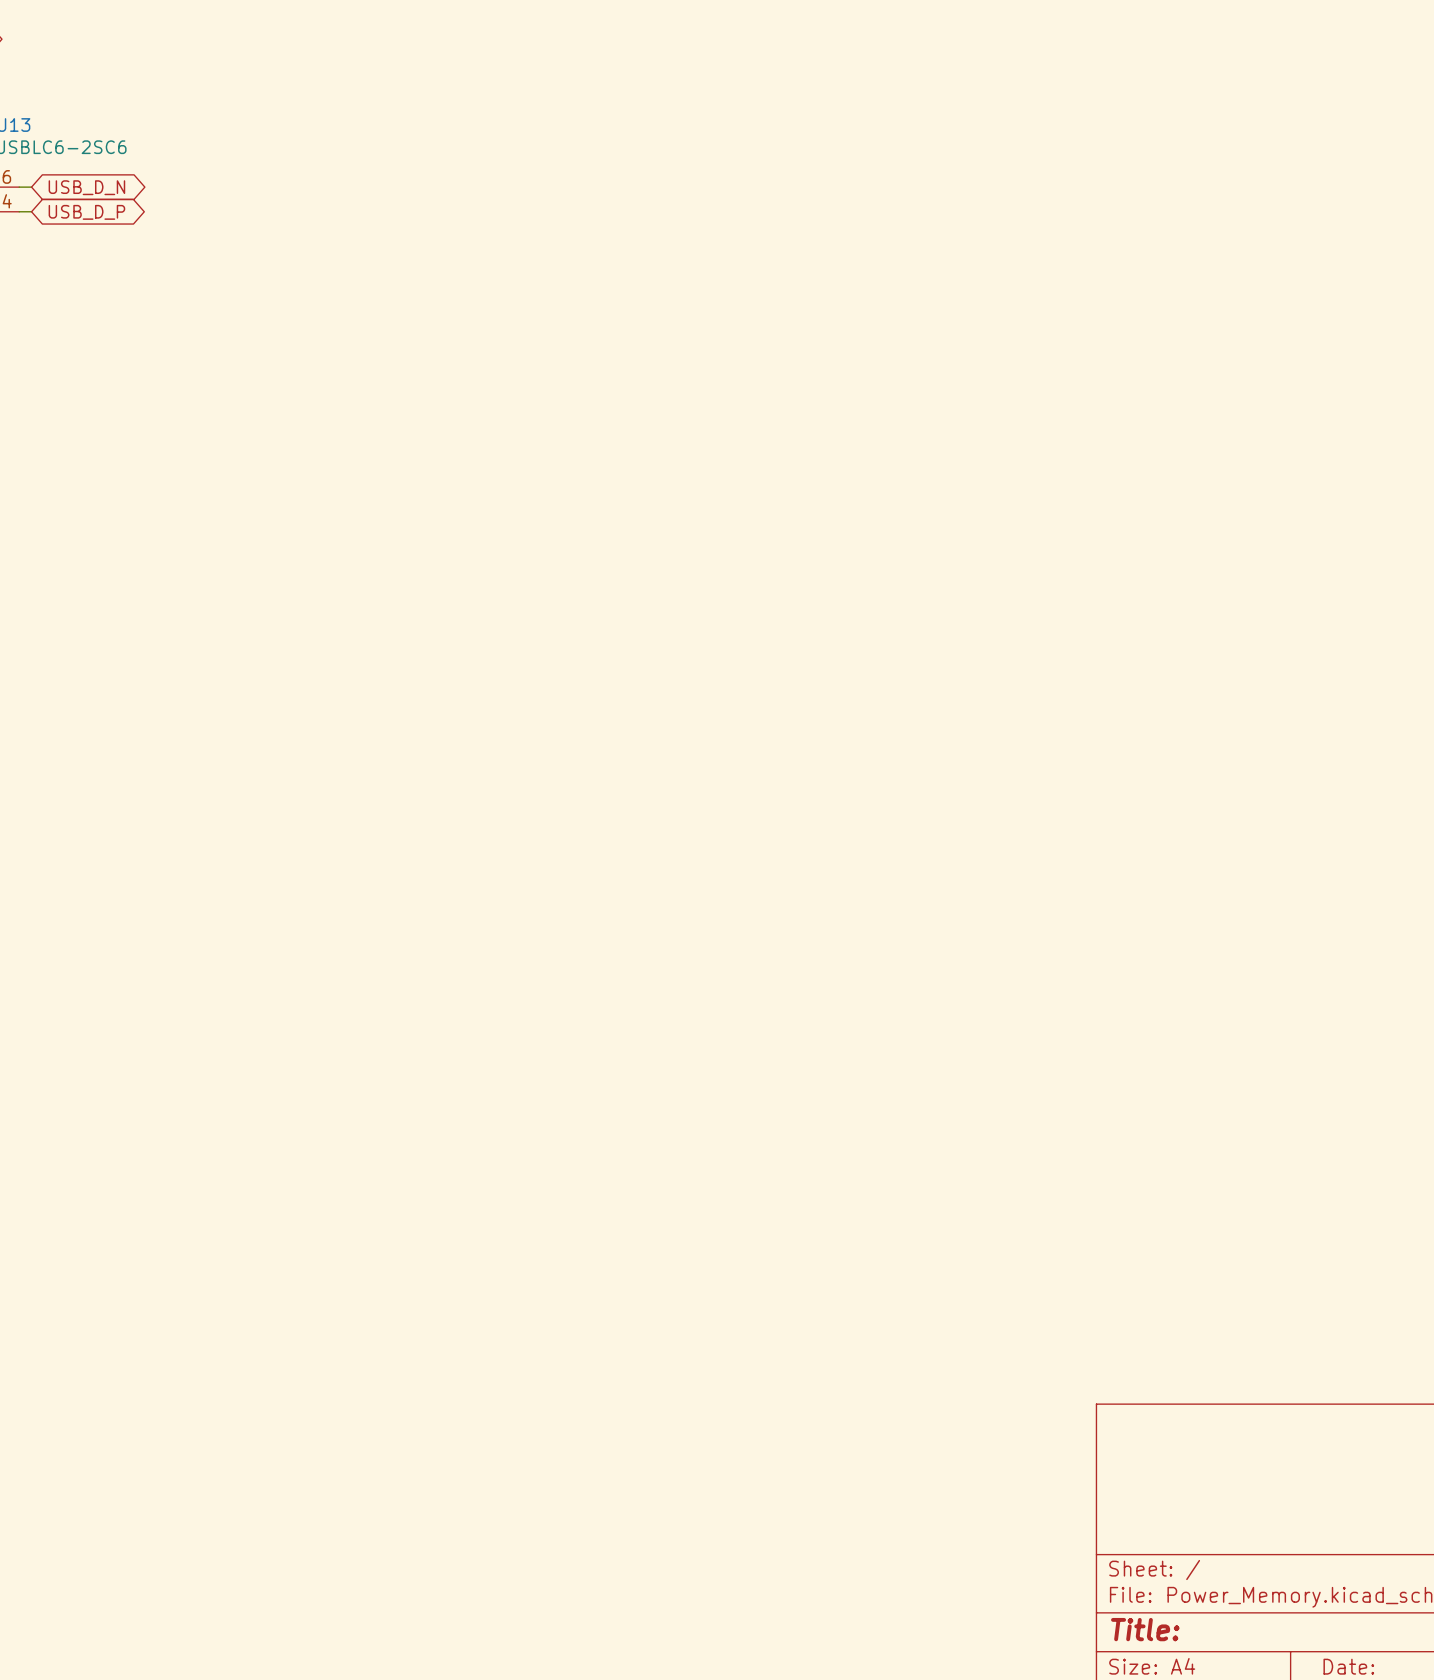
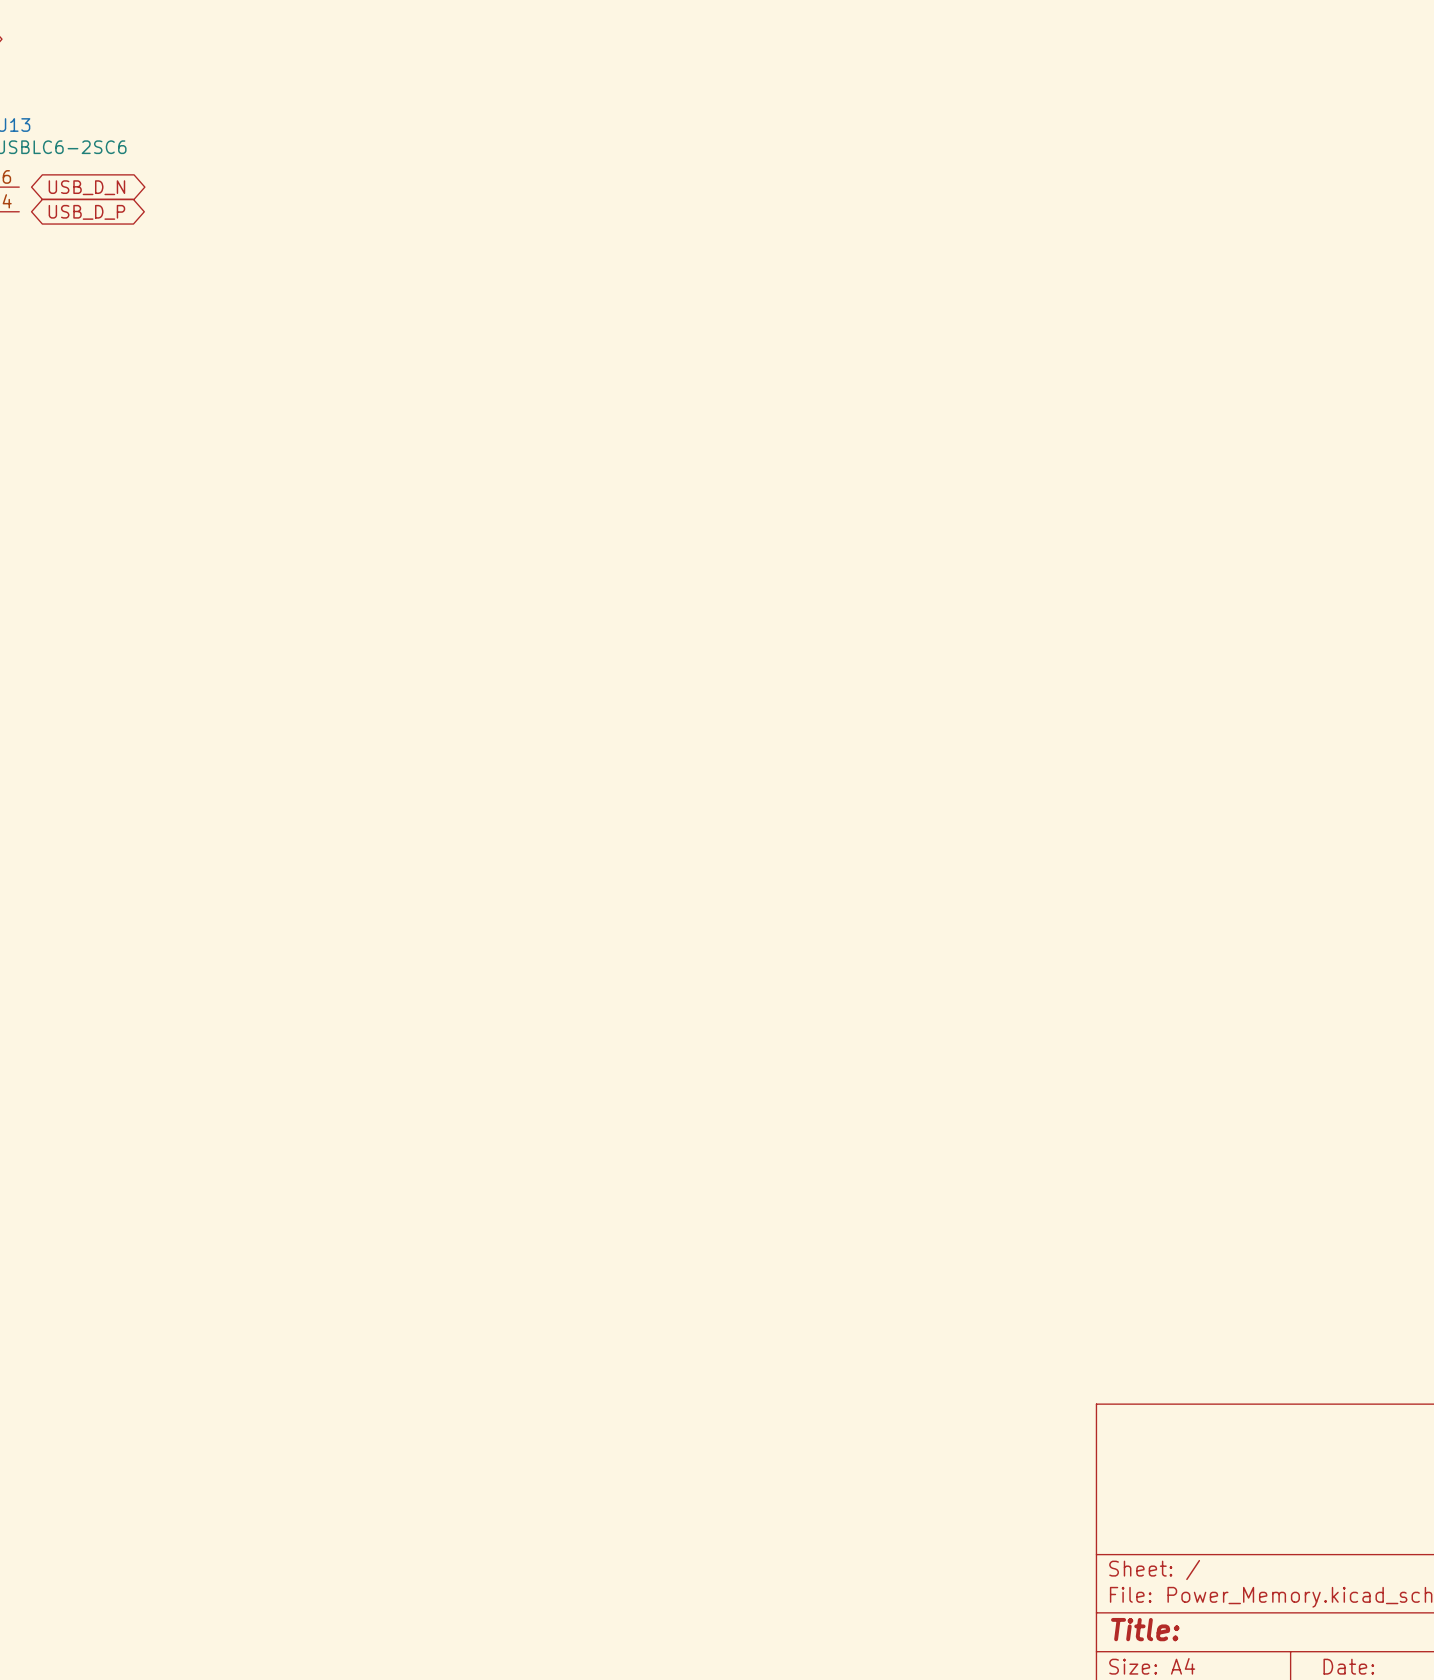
wire: (19, 187) (31, 187) -> none
wire: (19, 211) (31, 211) -> none

